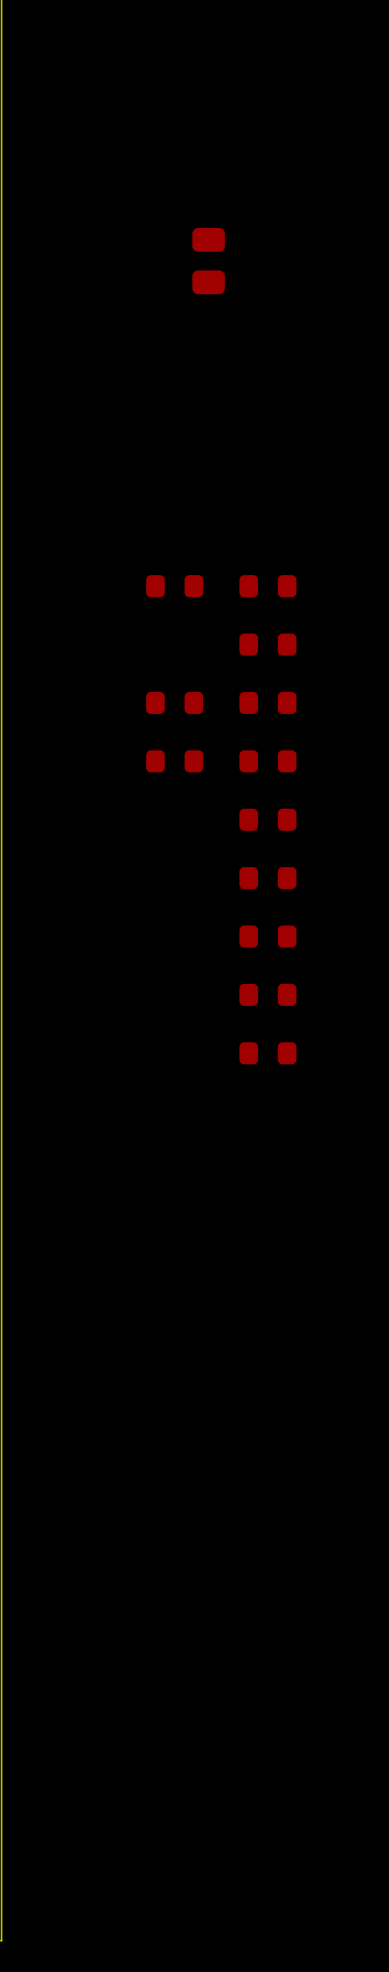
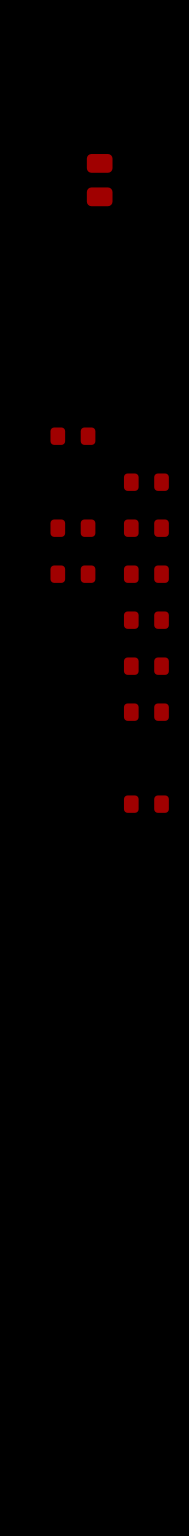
part: (267, 586) -> none
part: (267, 994) -> none

